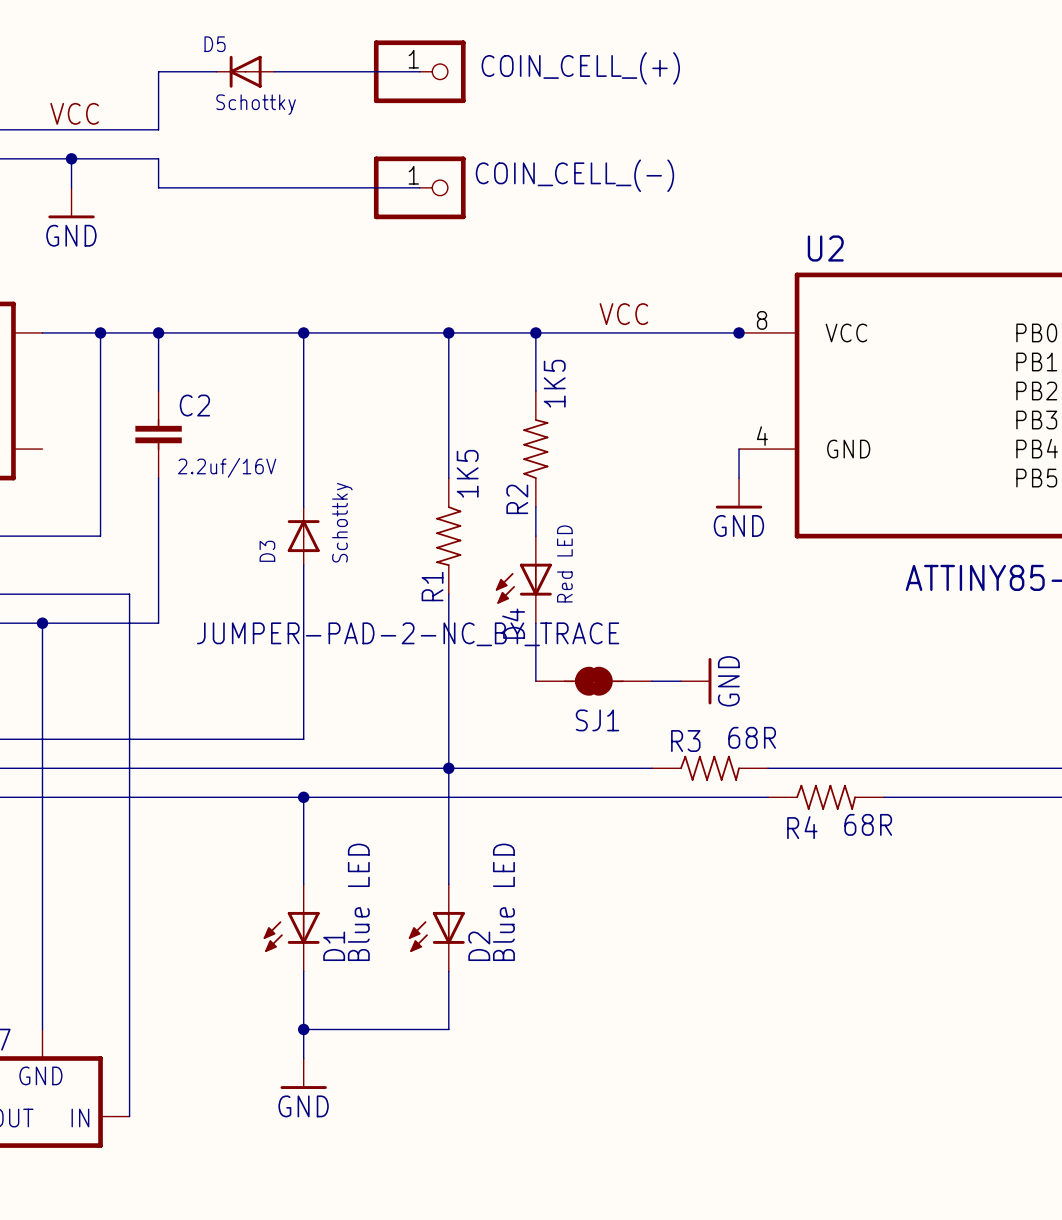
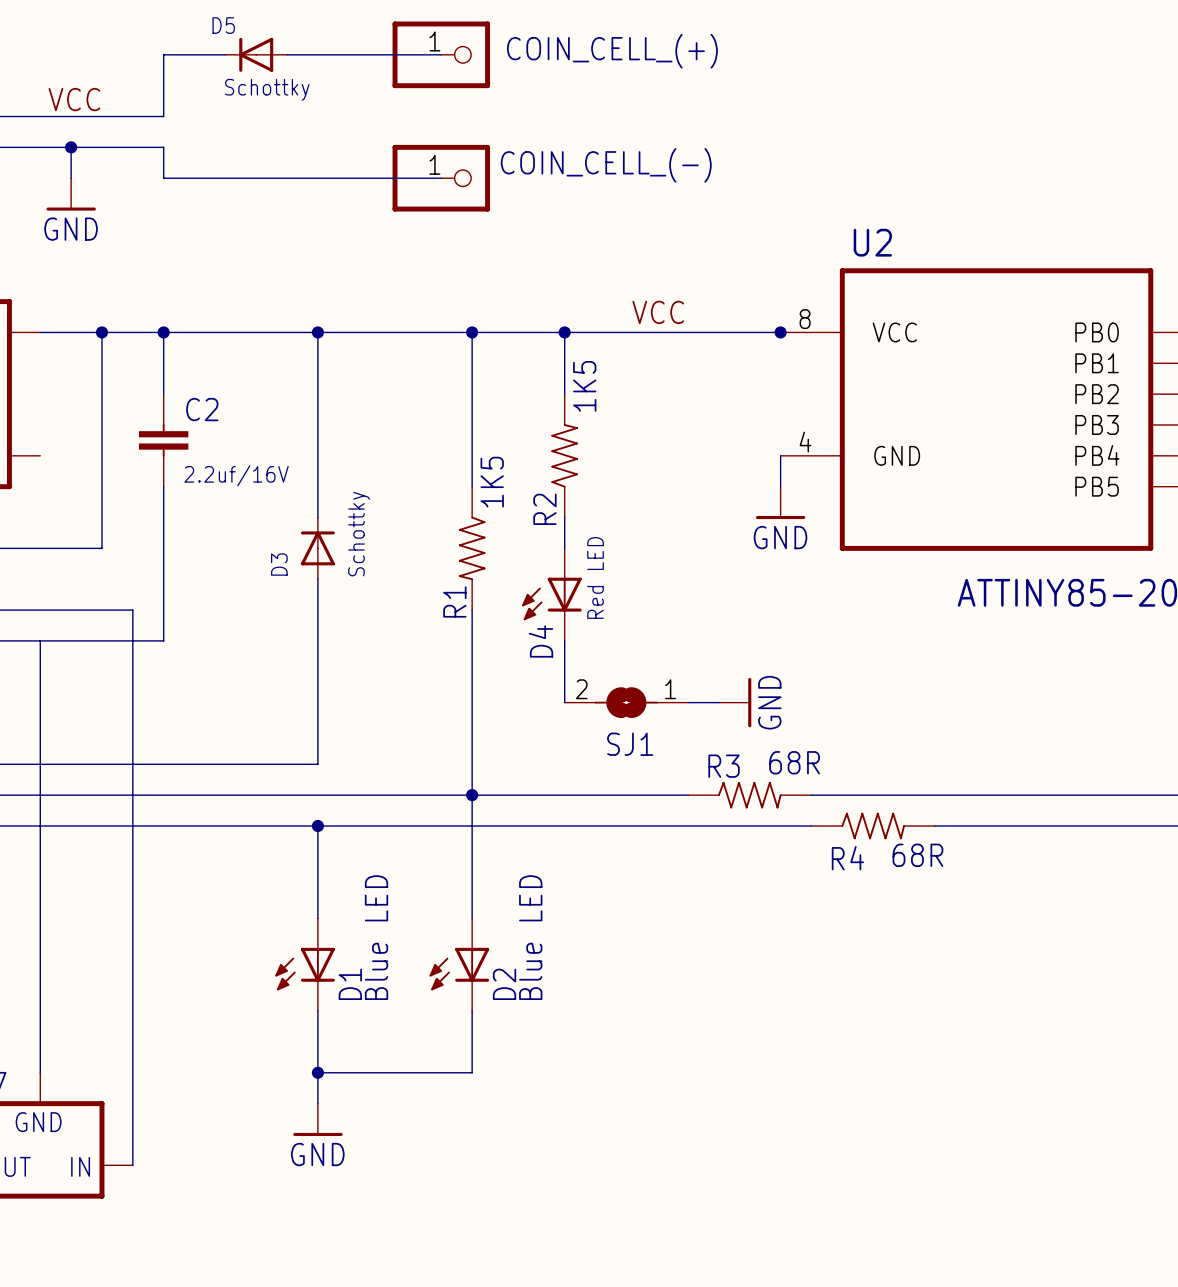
junction: (42, 623) -> none
SJ1 value: JUMPER-PAD-2-NC_BY_TRACE (408, 634) -> none
SJ1 symbol: [535, 666, 652, 696] -> [564, 687, 689, 719]

